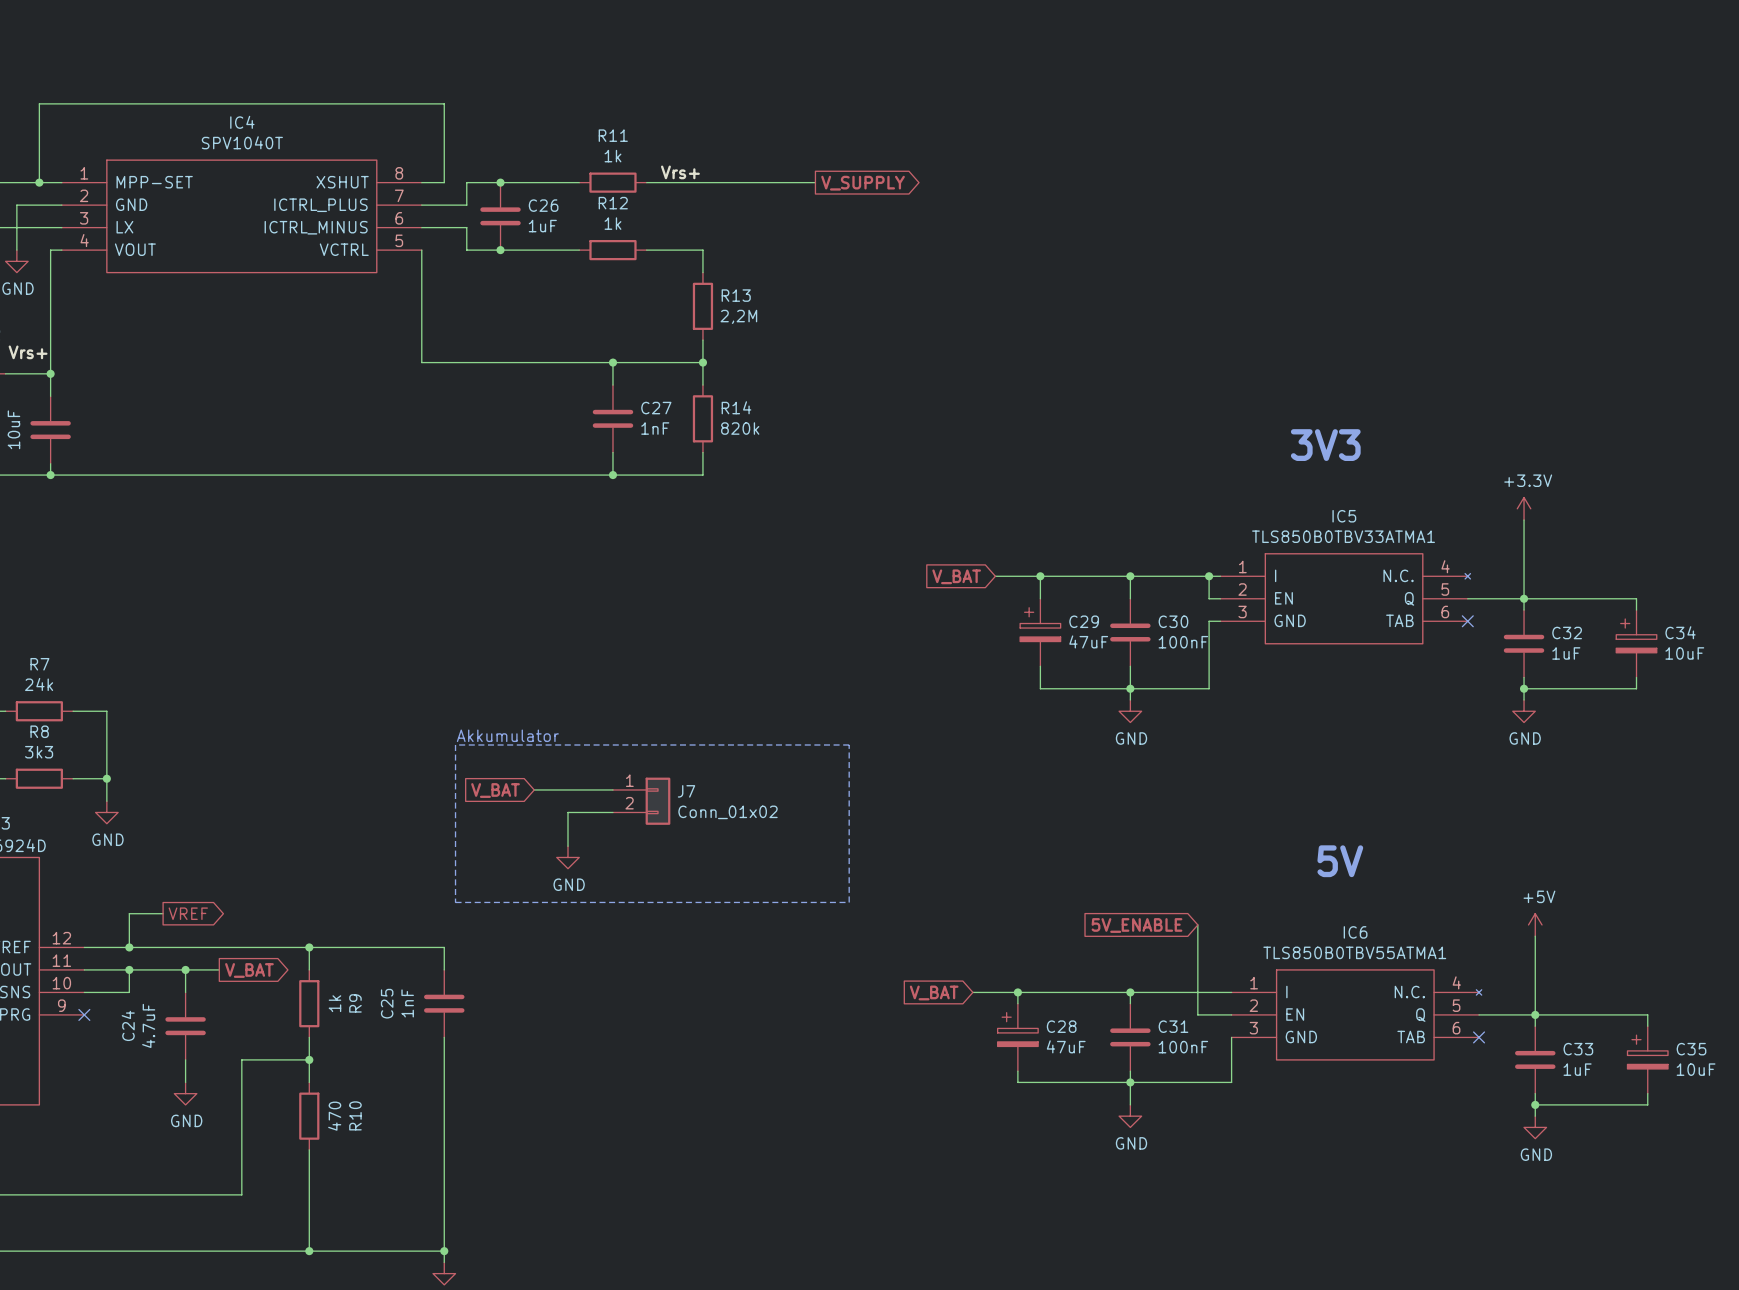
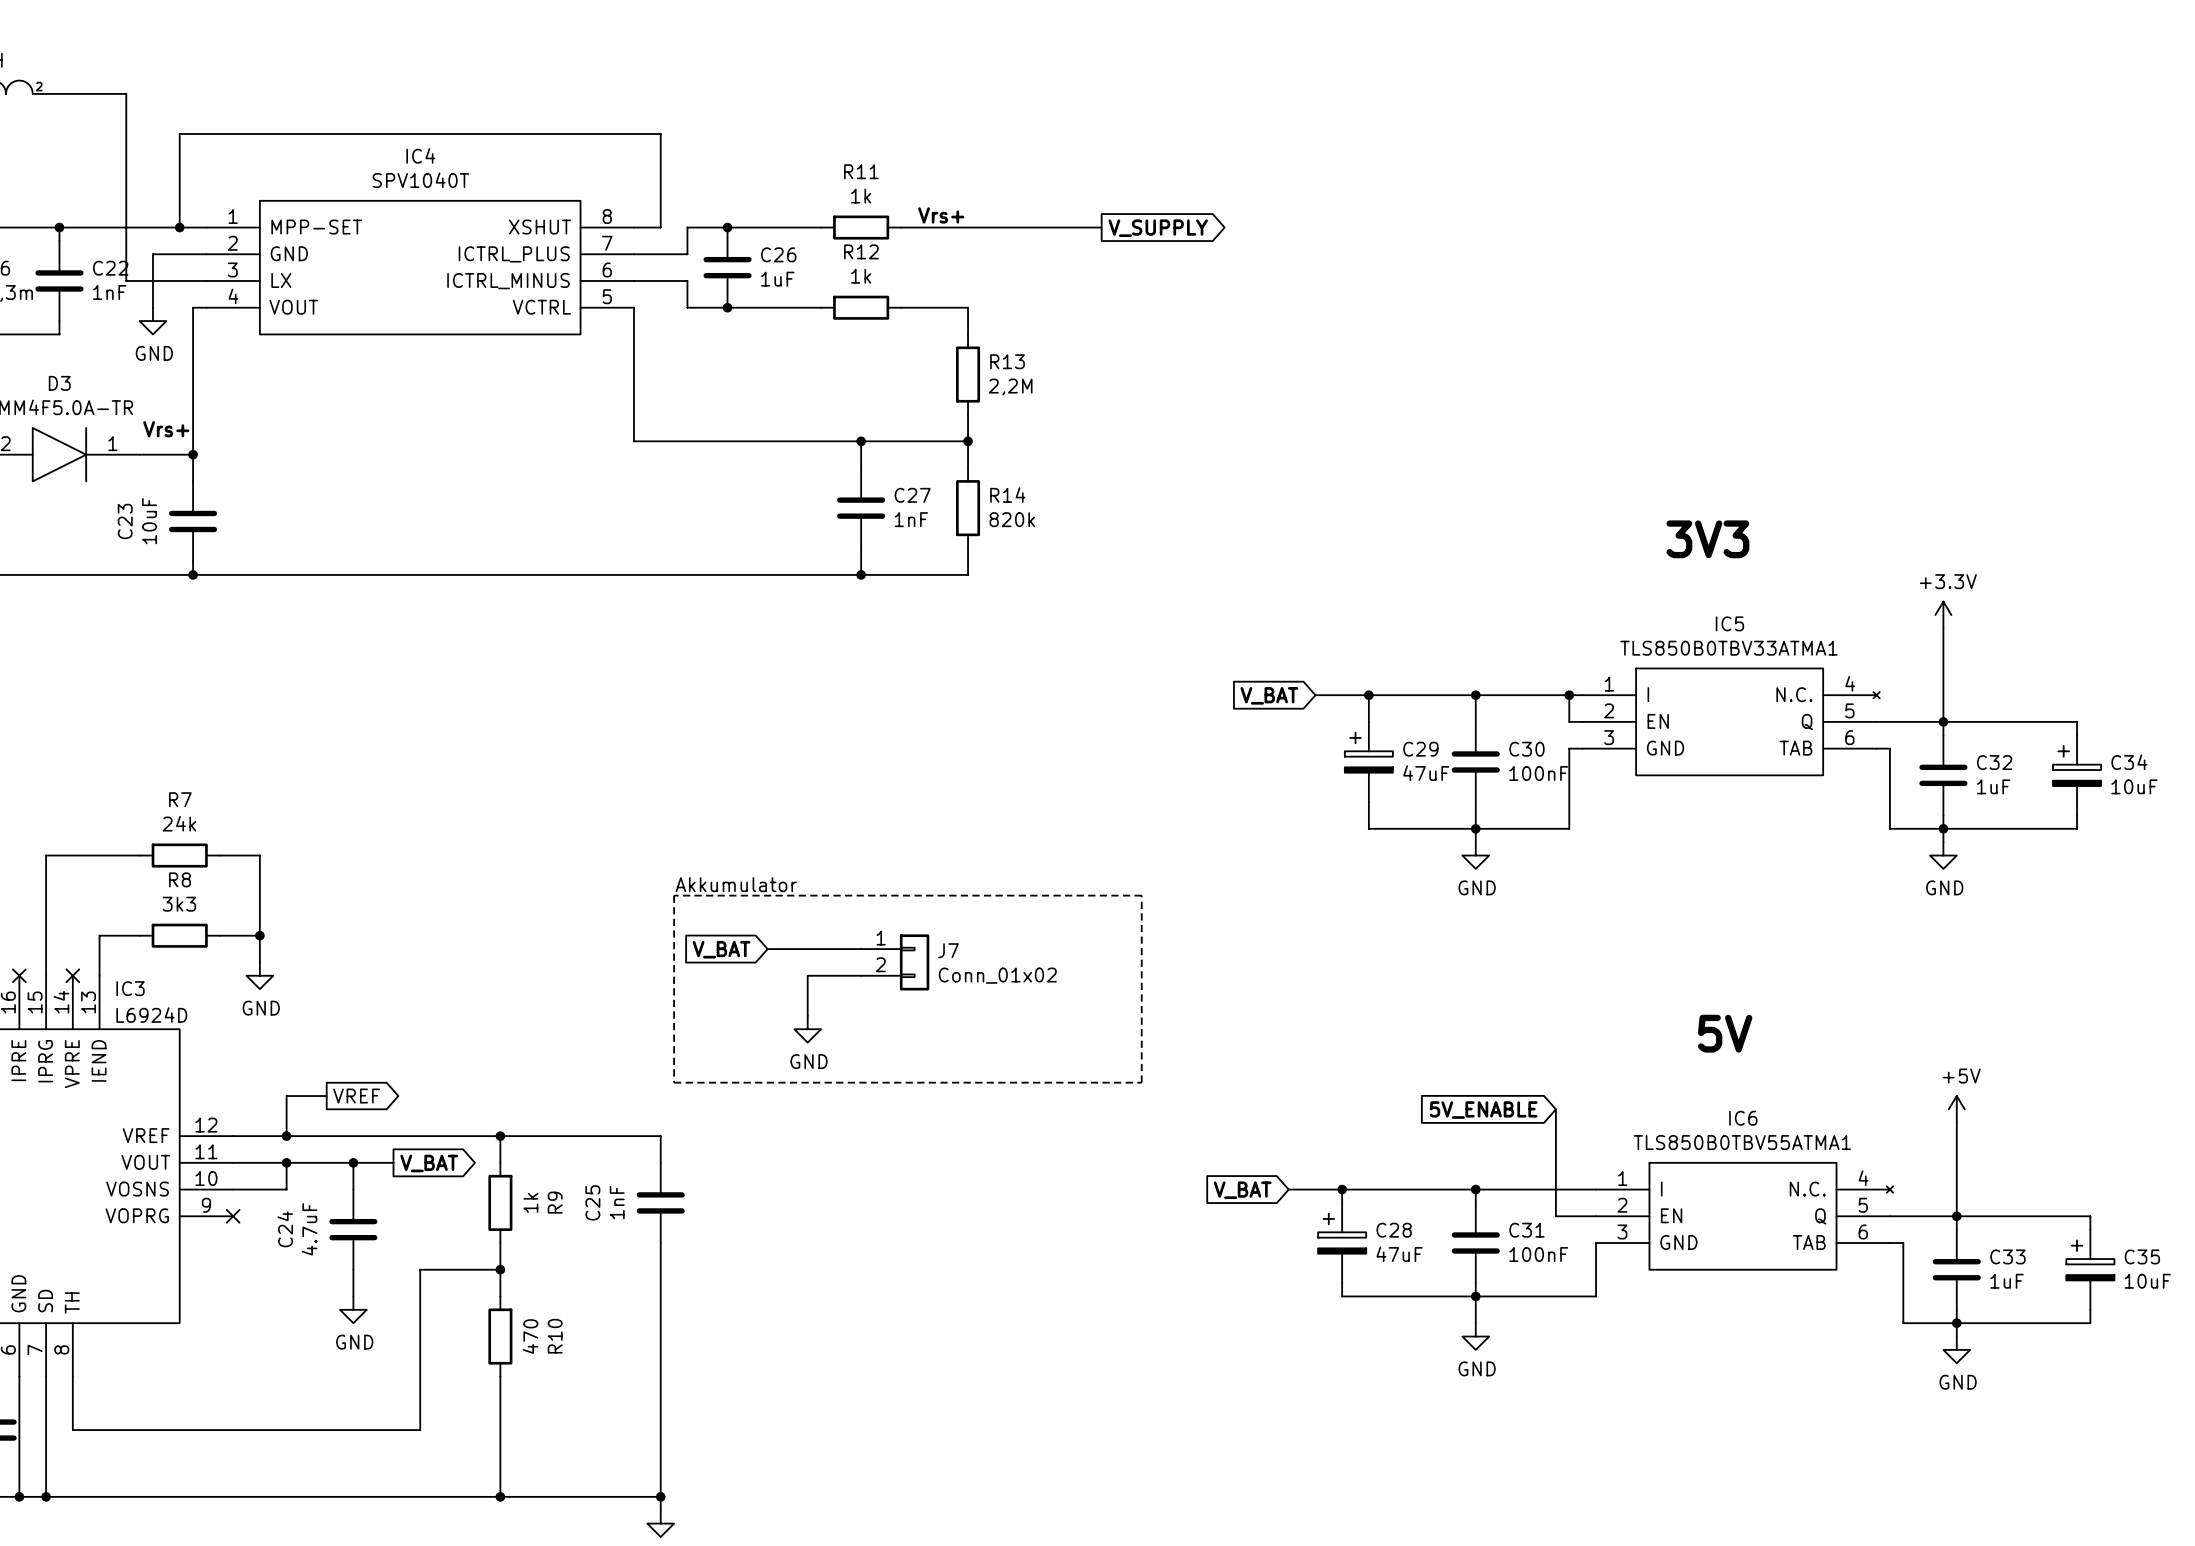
wire: none -> (1876, 748) (1889, 748) (1889, 828) (1943, 828)
no-connect mark: (1467, 621) -> none
wire: none -> (1889, 1243) (1903, 1243) (1903, 1323) (1956, 1323)
no-connect mark: (1479, 1037) -> none

